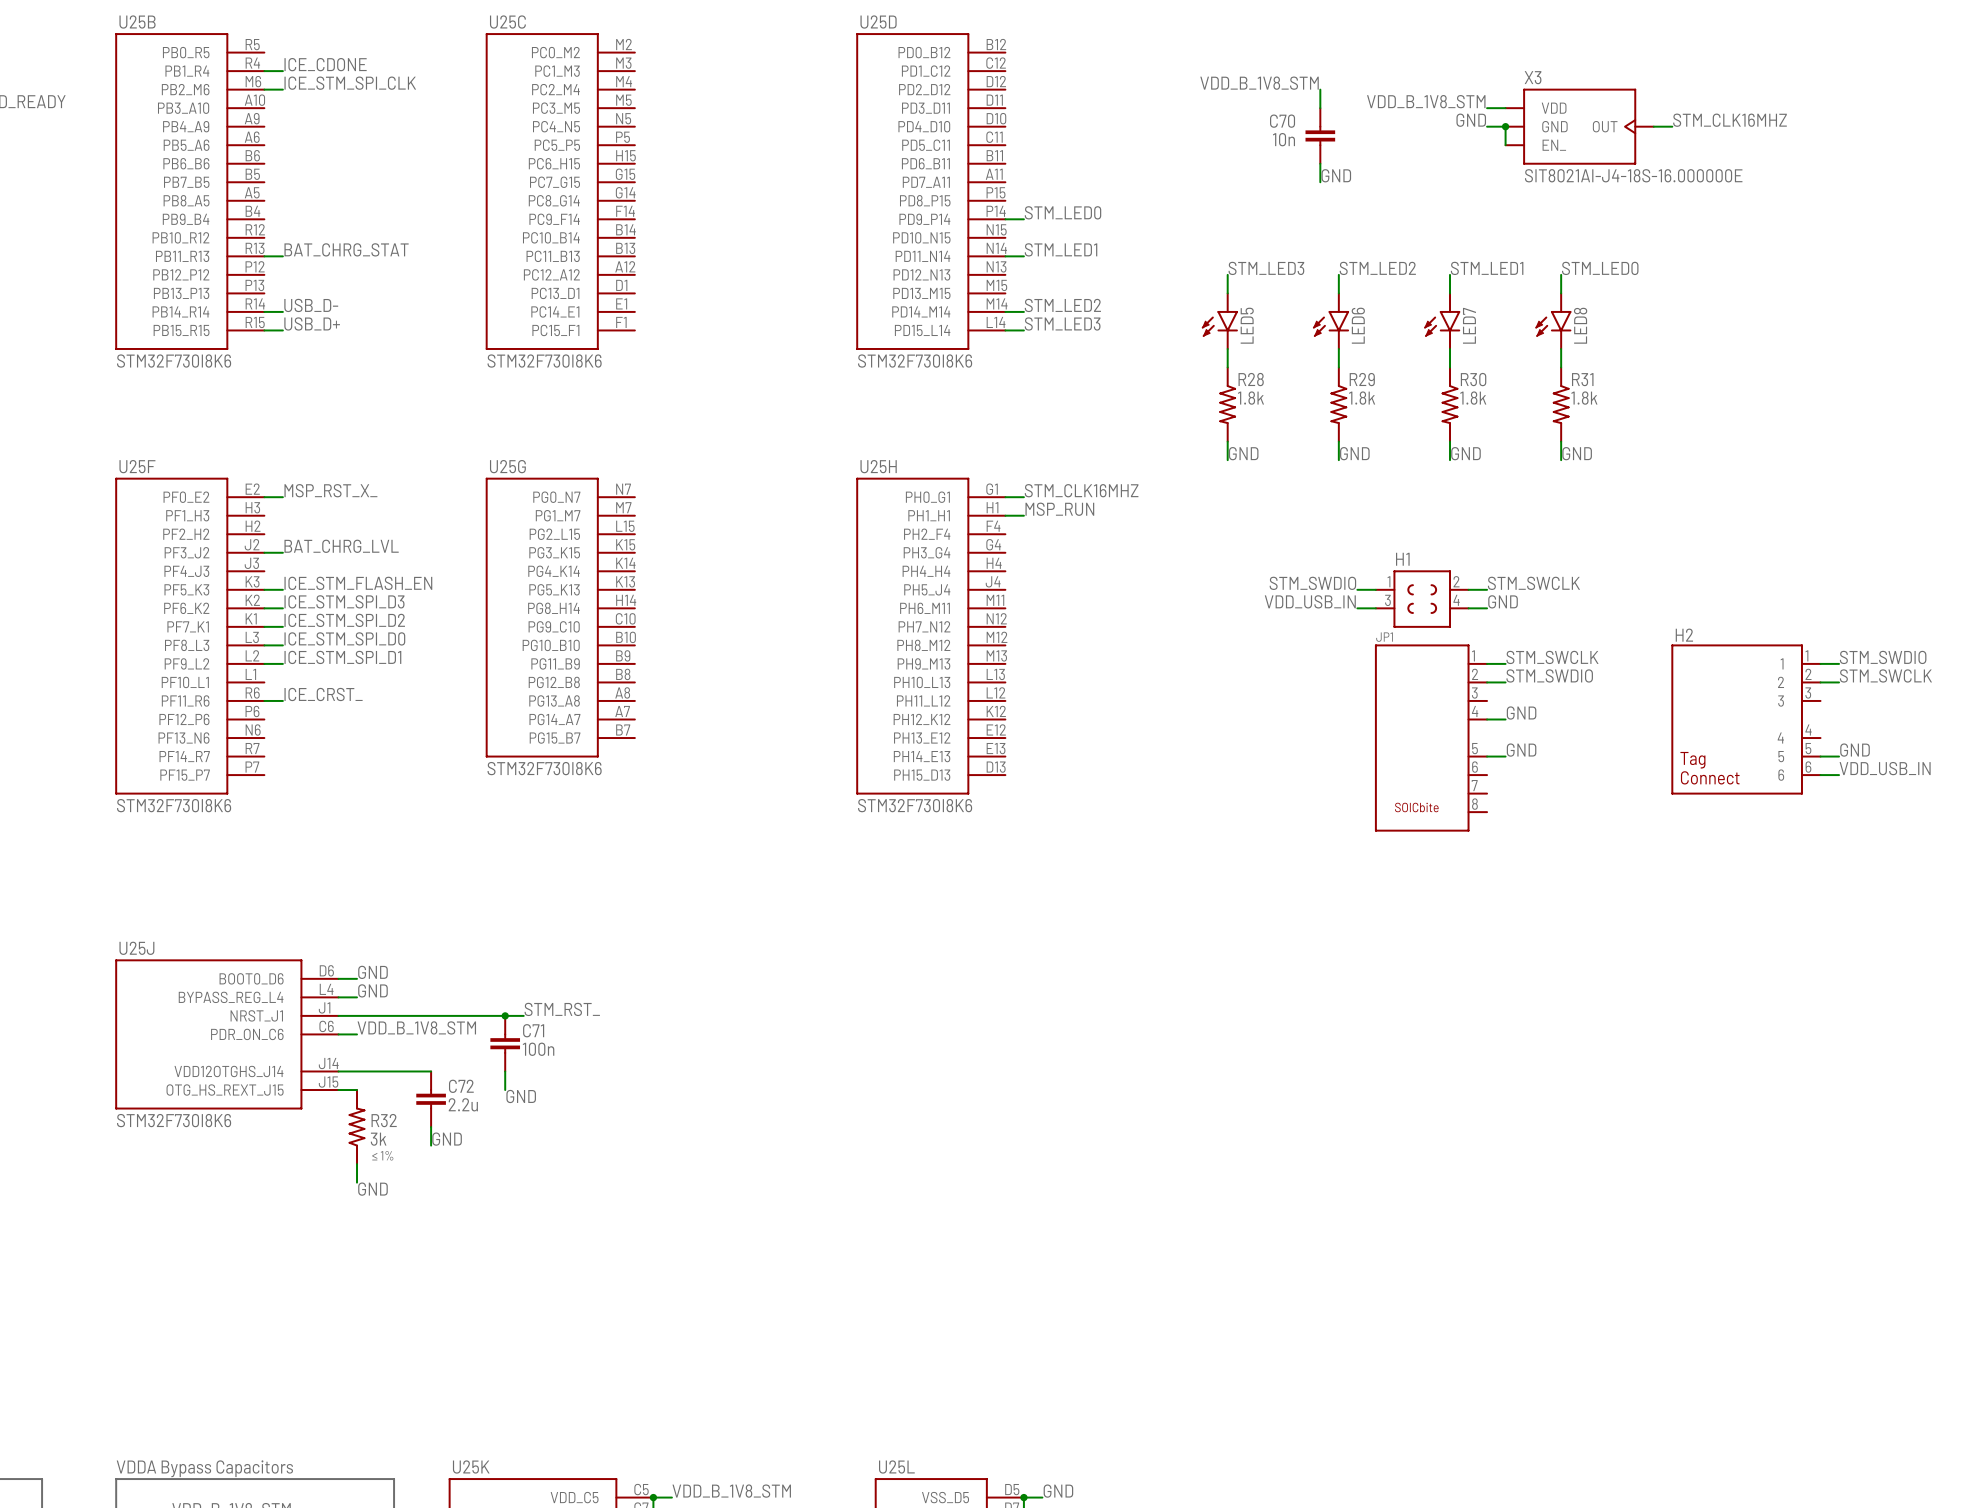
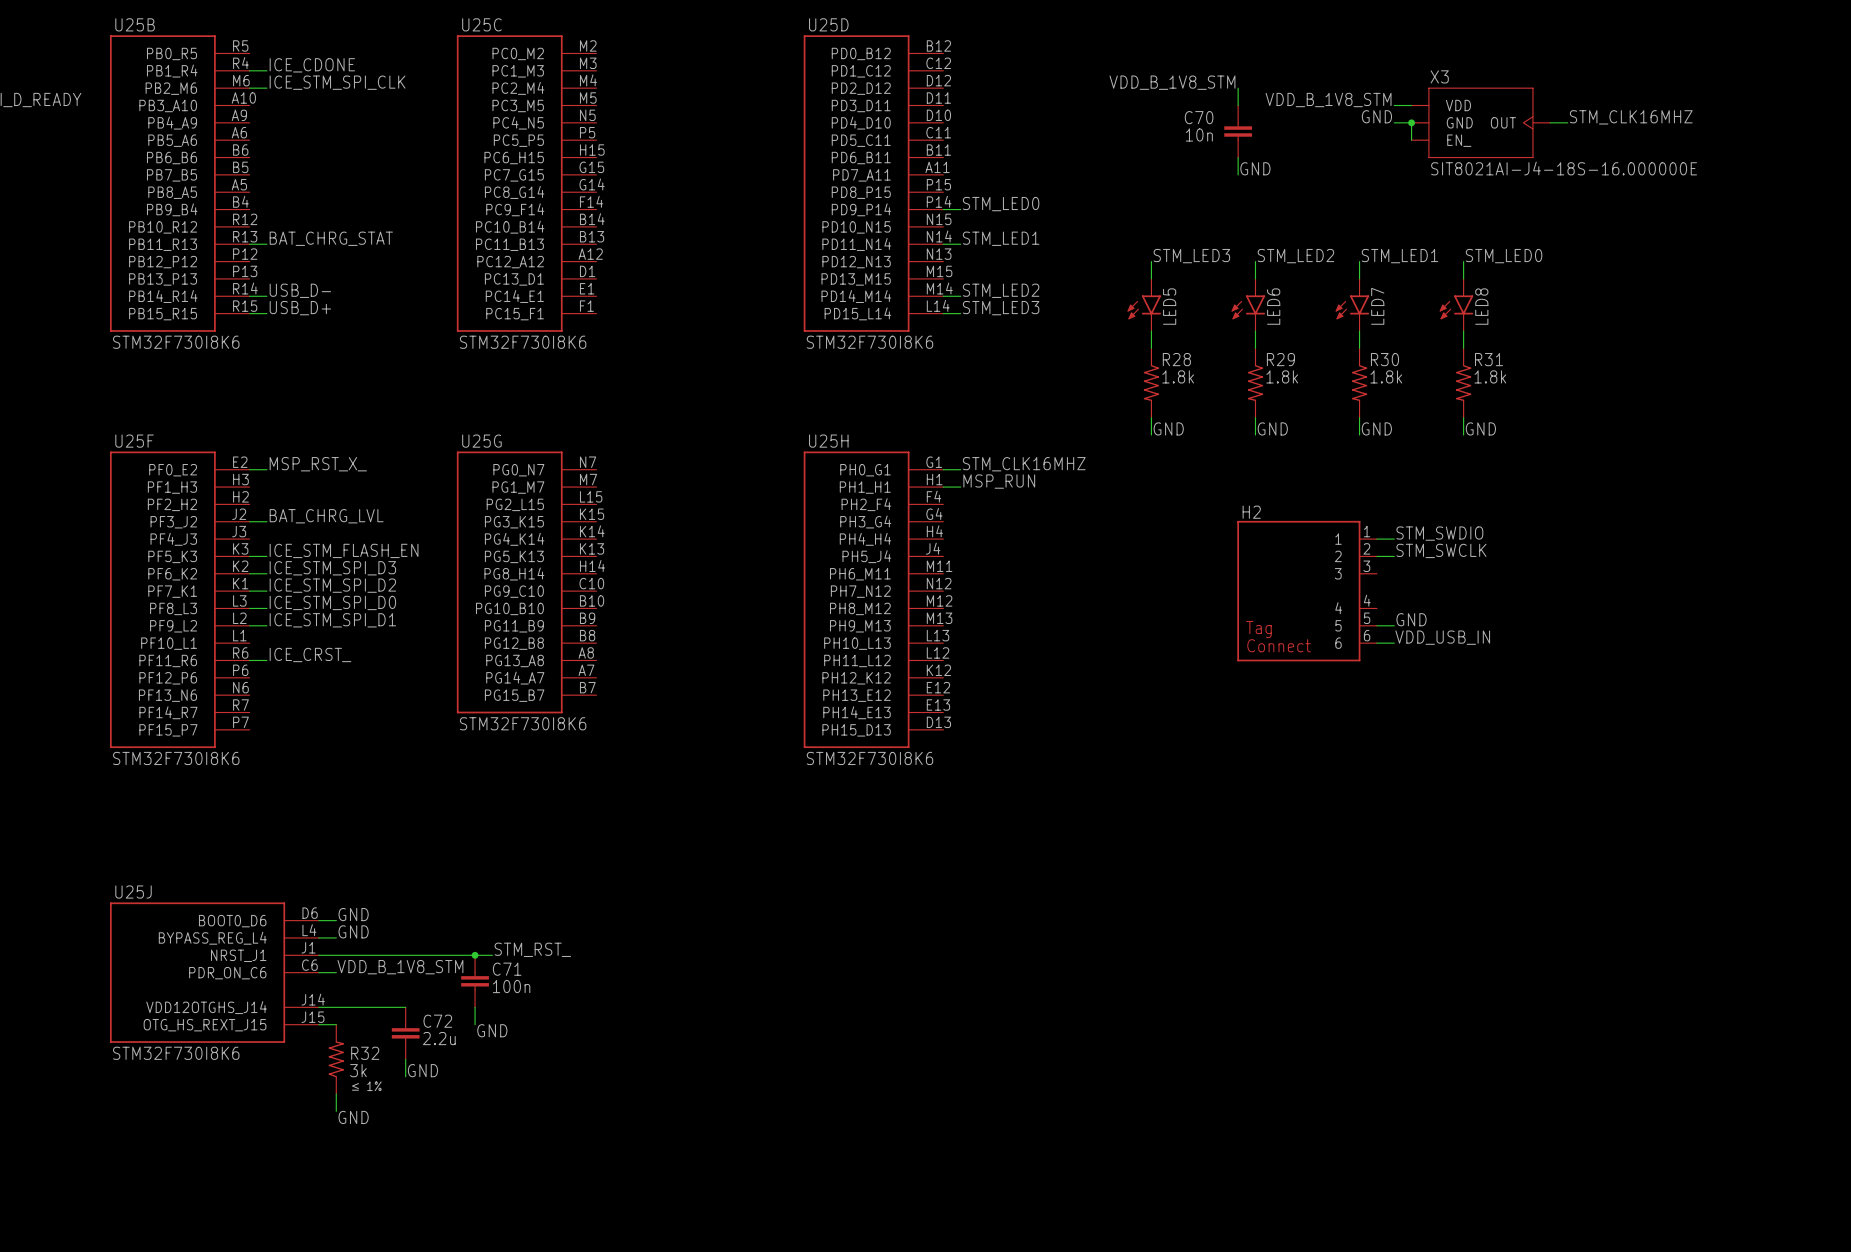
label: none -> STM_SWDIO (1439, 533)
label: STM_SWDIO (1312, 583) -> none
wire: (1357, 589) (1375, 589) -> none
H1: (1422, 599) -> none
label position: VDD_USB_IN (1310, 601) -> VDD_USB_IN (1442, 637)
label: GND (1503, 601) -> none
wire: (1357, 608) (1375, 608) -> none
wire: (1468, 608) (1487, 608) -> (1376, 539) (1394, 539)
label: none -> GND (1411, 619)
label: STM_SWCLK (1552, 657) -> none
label: STM_SWDIO (1883, 657) -> none
wire: (1820, 663) (1839, 663) -> none
label: STM_SWDIO (1549, 675) -> none
label: STM_SWCLK (1885, 675) -> none
wire: (1820, 682) (1839, 682) -> none
label: GND (1521, 713) -> none
wire: (1487, 719) (1505, 719) -> none
H2 position: (1745, 719) -> (1307, 591)
JP1: (1431, 738) -> none
label: GND (1521, 750) -> none
label: GND (1855, 750) -> none
wire: (1487, 756) (1505, 756) -> none
wire: (1820, 756) (1839, 756) -> none
label: VDD_USB_IN (1885, 768) -> none
wire: (1820, 775) (1839, 775) -> none

